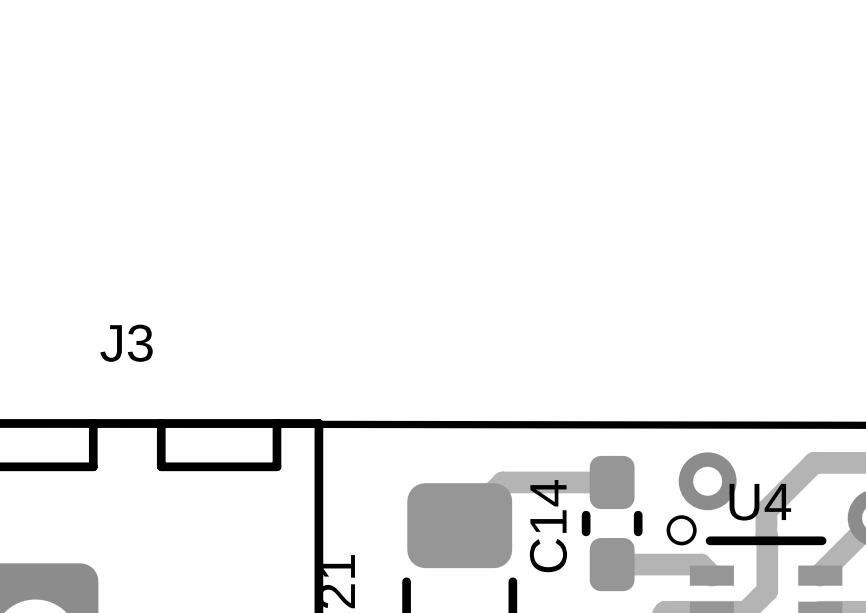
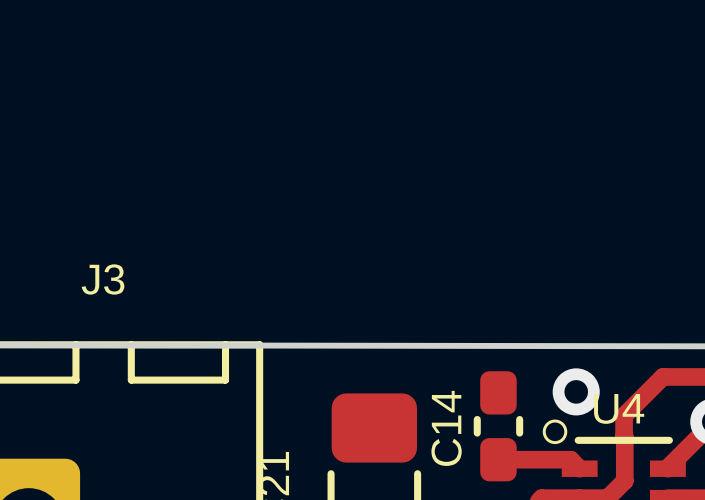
track: (612, 482) (502, 482) (459, 525) -> none

